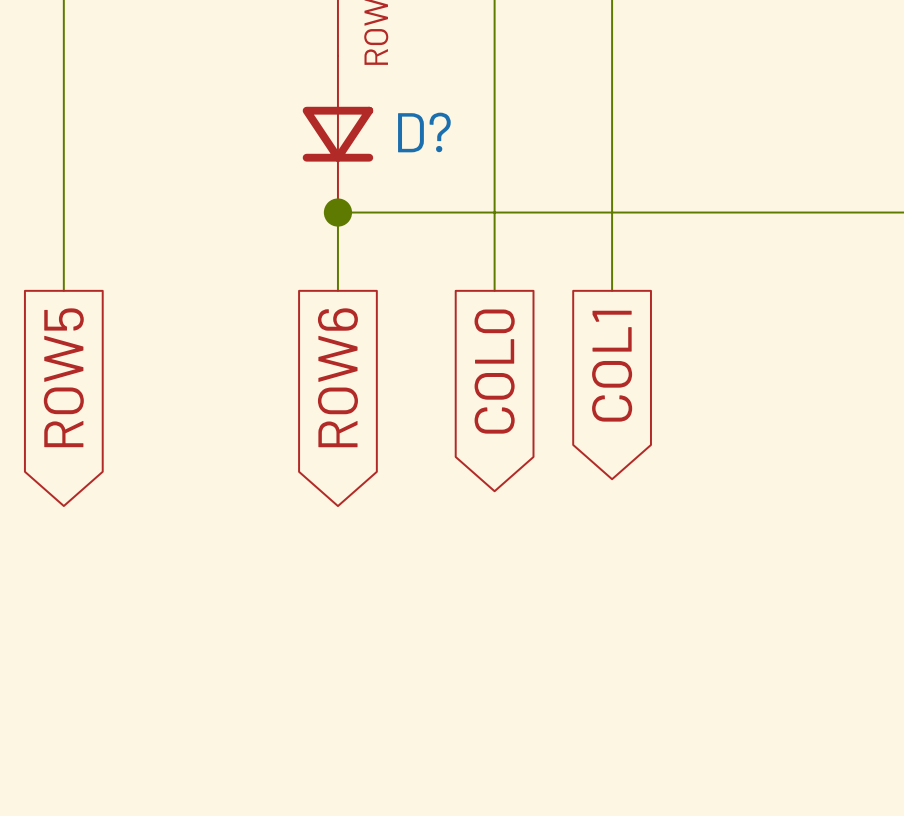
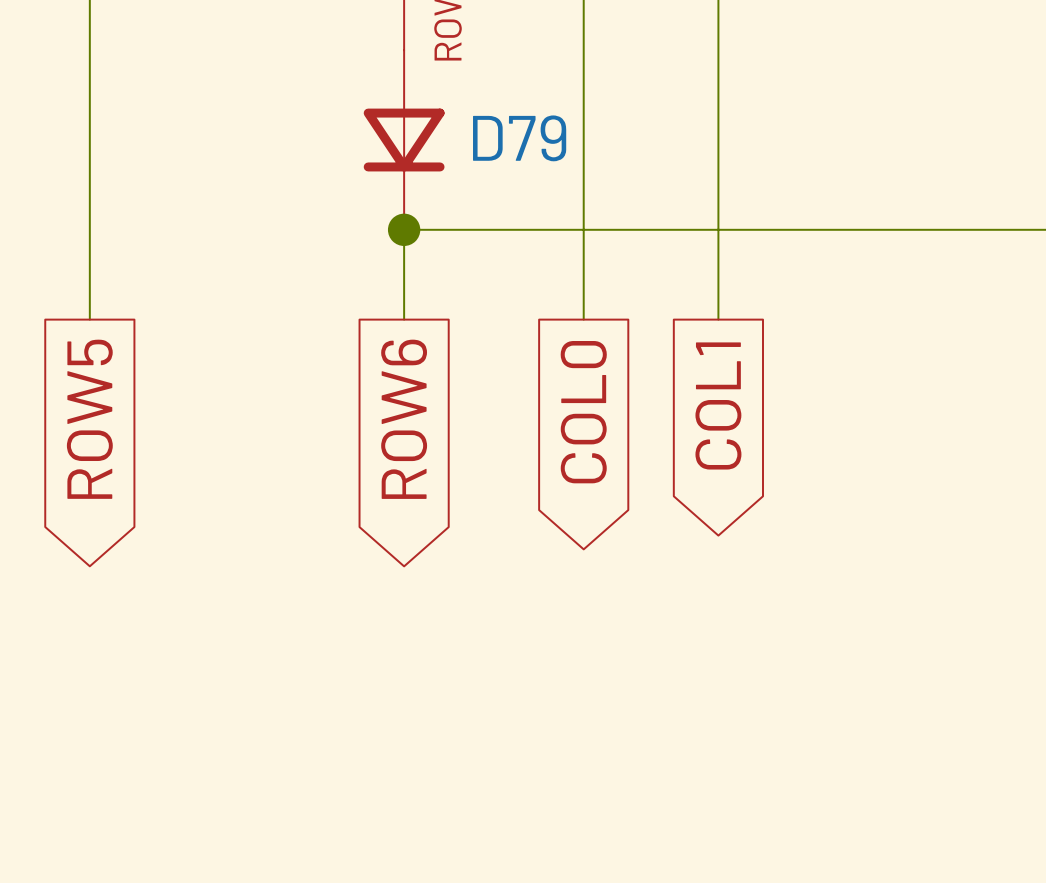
D? name: D? (424, 132) -> D79 (519, 138)

